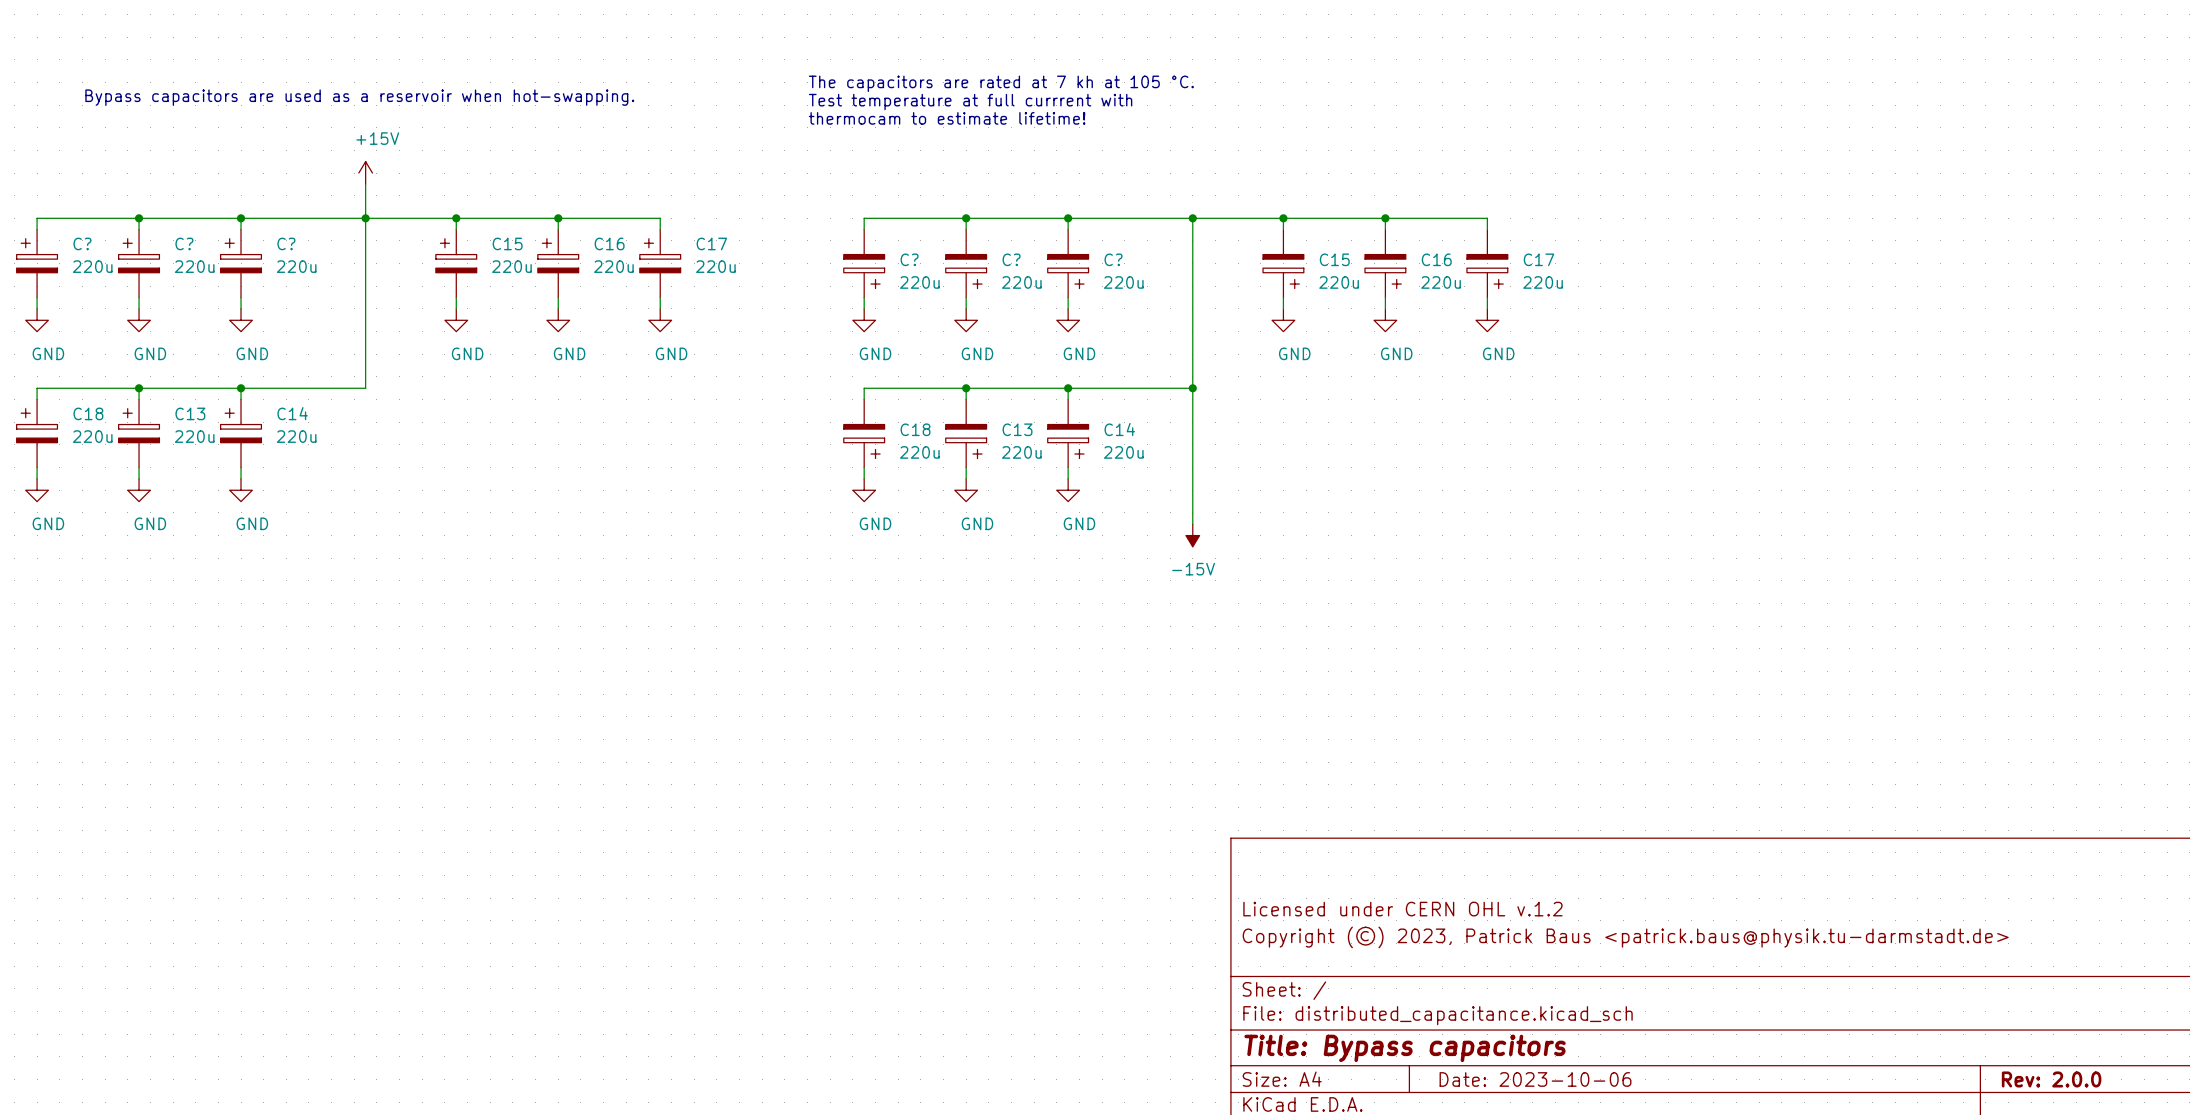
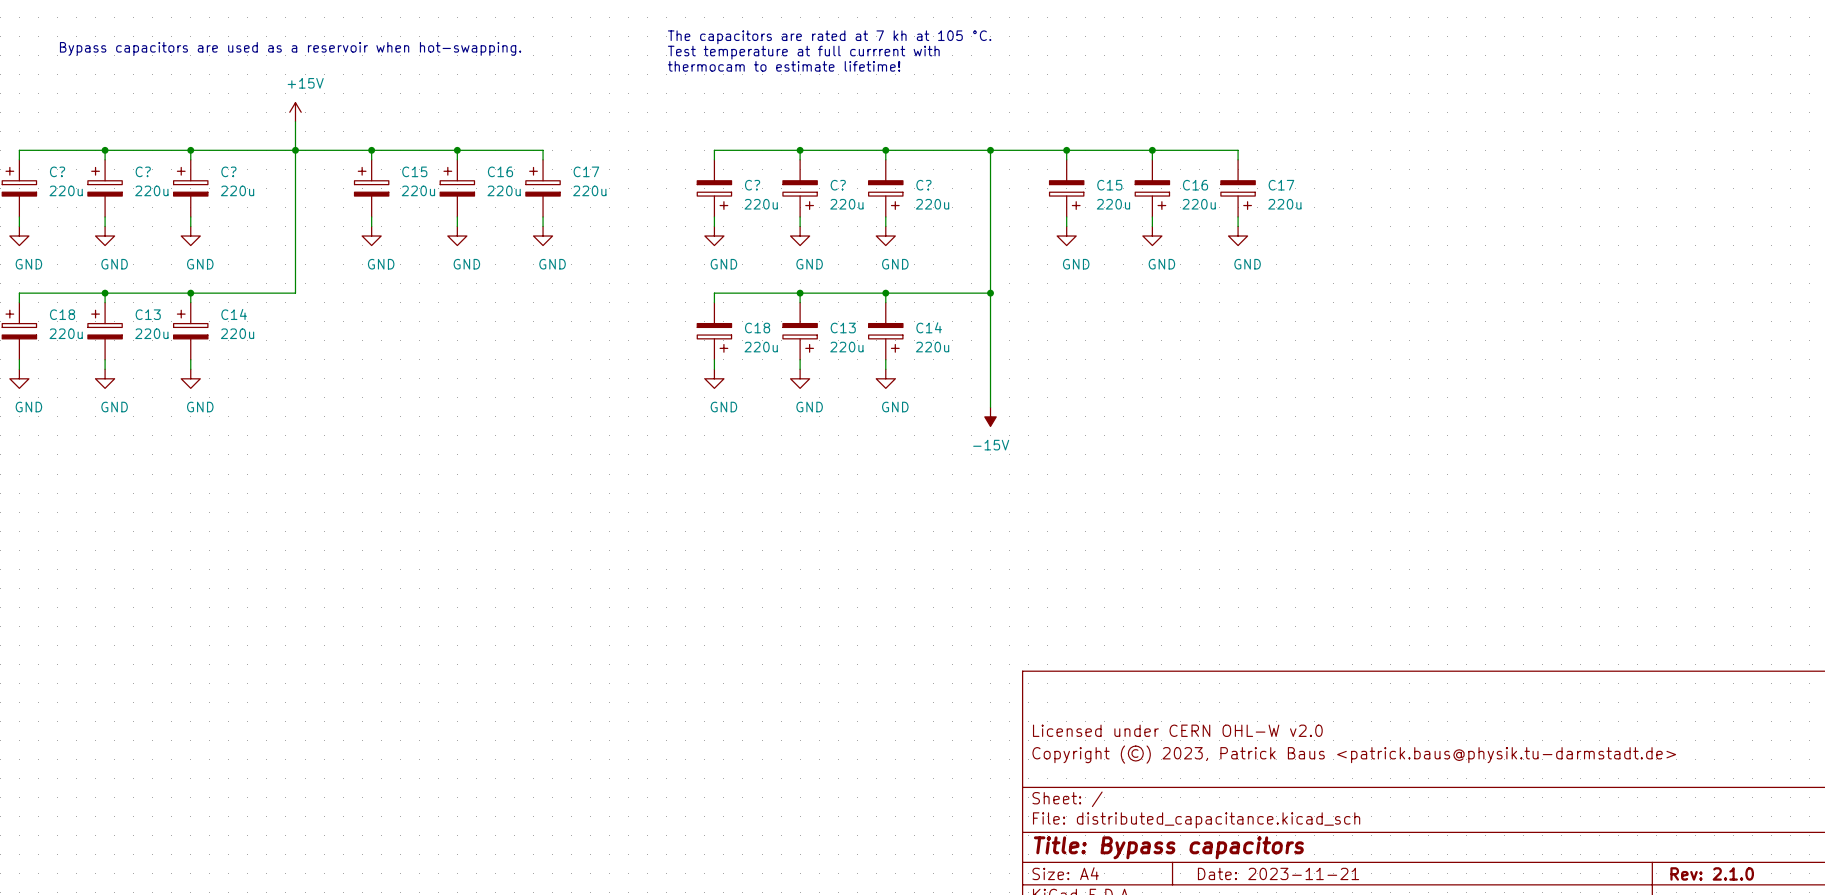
title block: Licensed under CERN OHL v.1.2 (1402, 909) -> Licensed under CERN OHL-W v2.0 (1177, 730)
title block: Date: 2023-10-06 (1535, 1079) -> Date: 2023-11-21 (1278, 873)
title block: Rev: 2.0.0 (2051, 1079) -> Rev: 2.1.0 (1712, 873)

